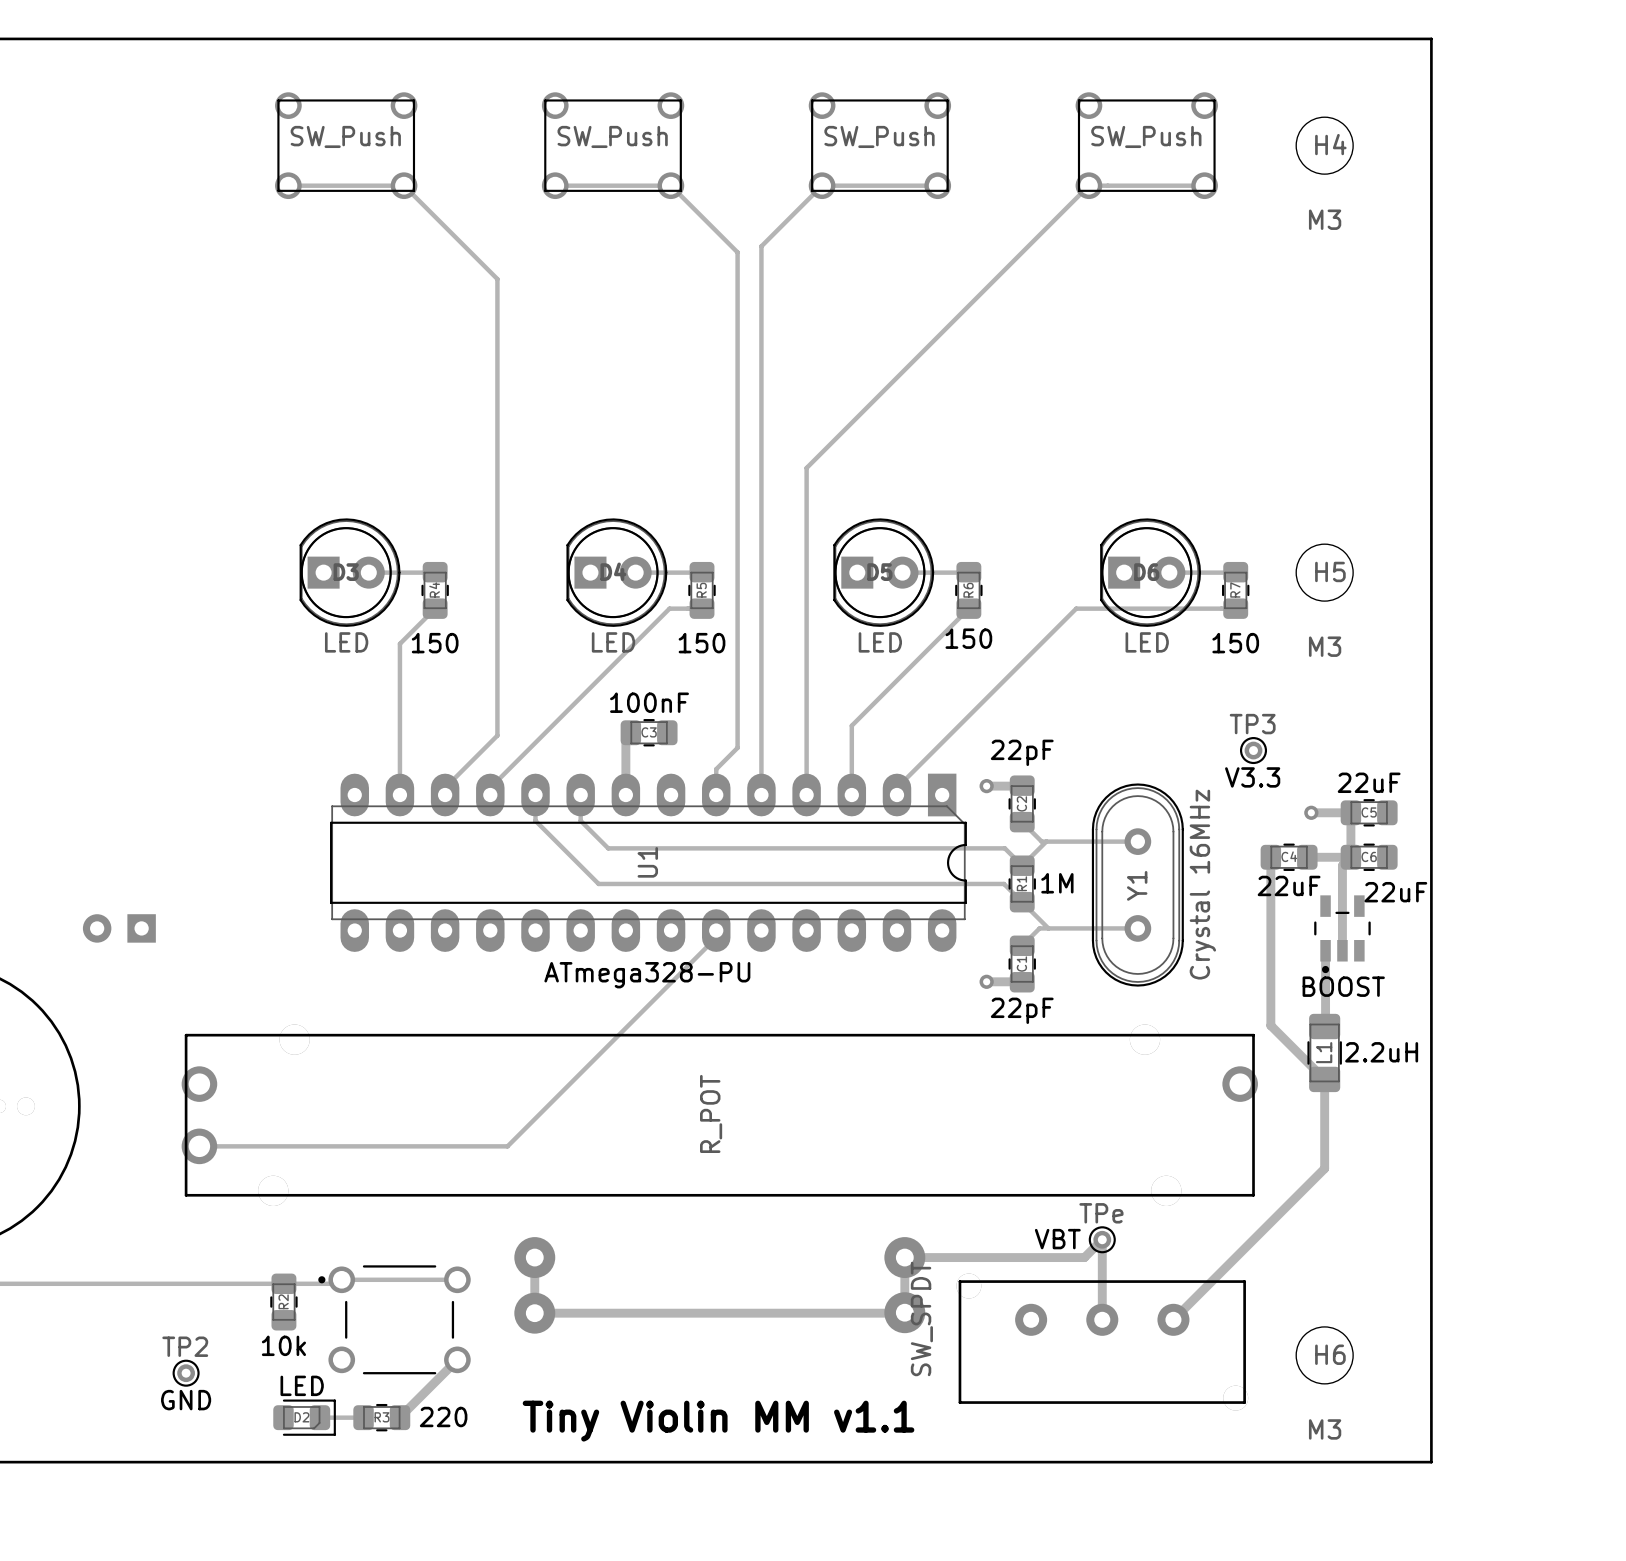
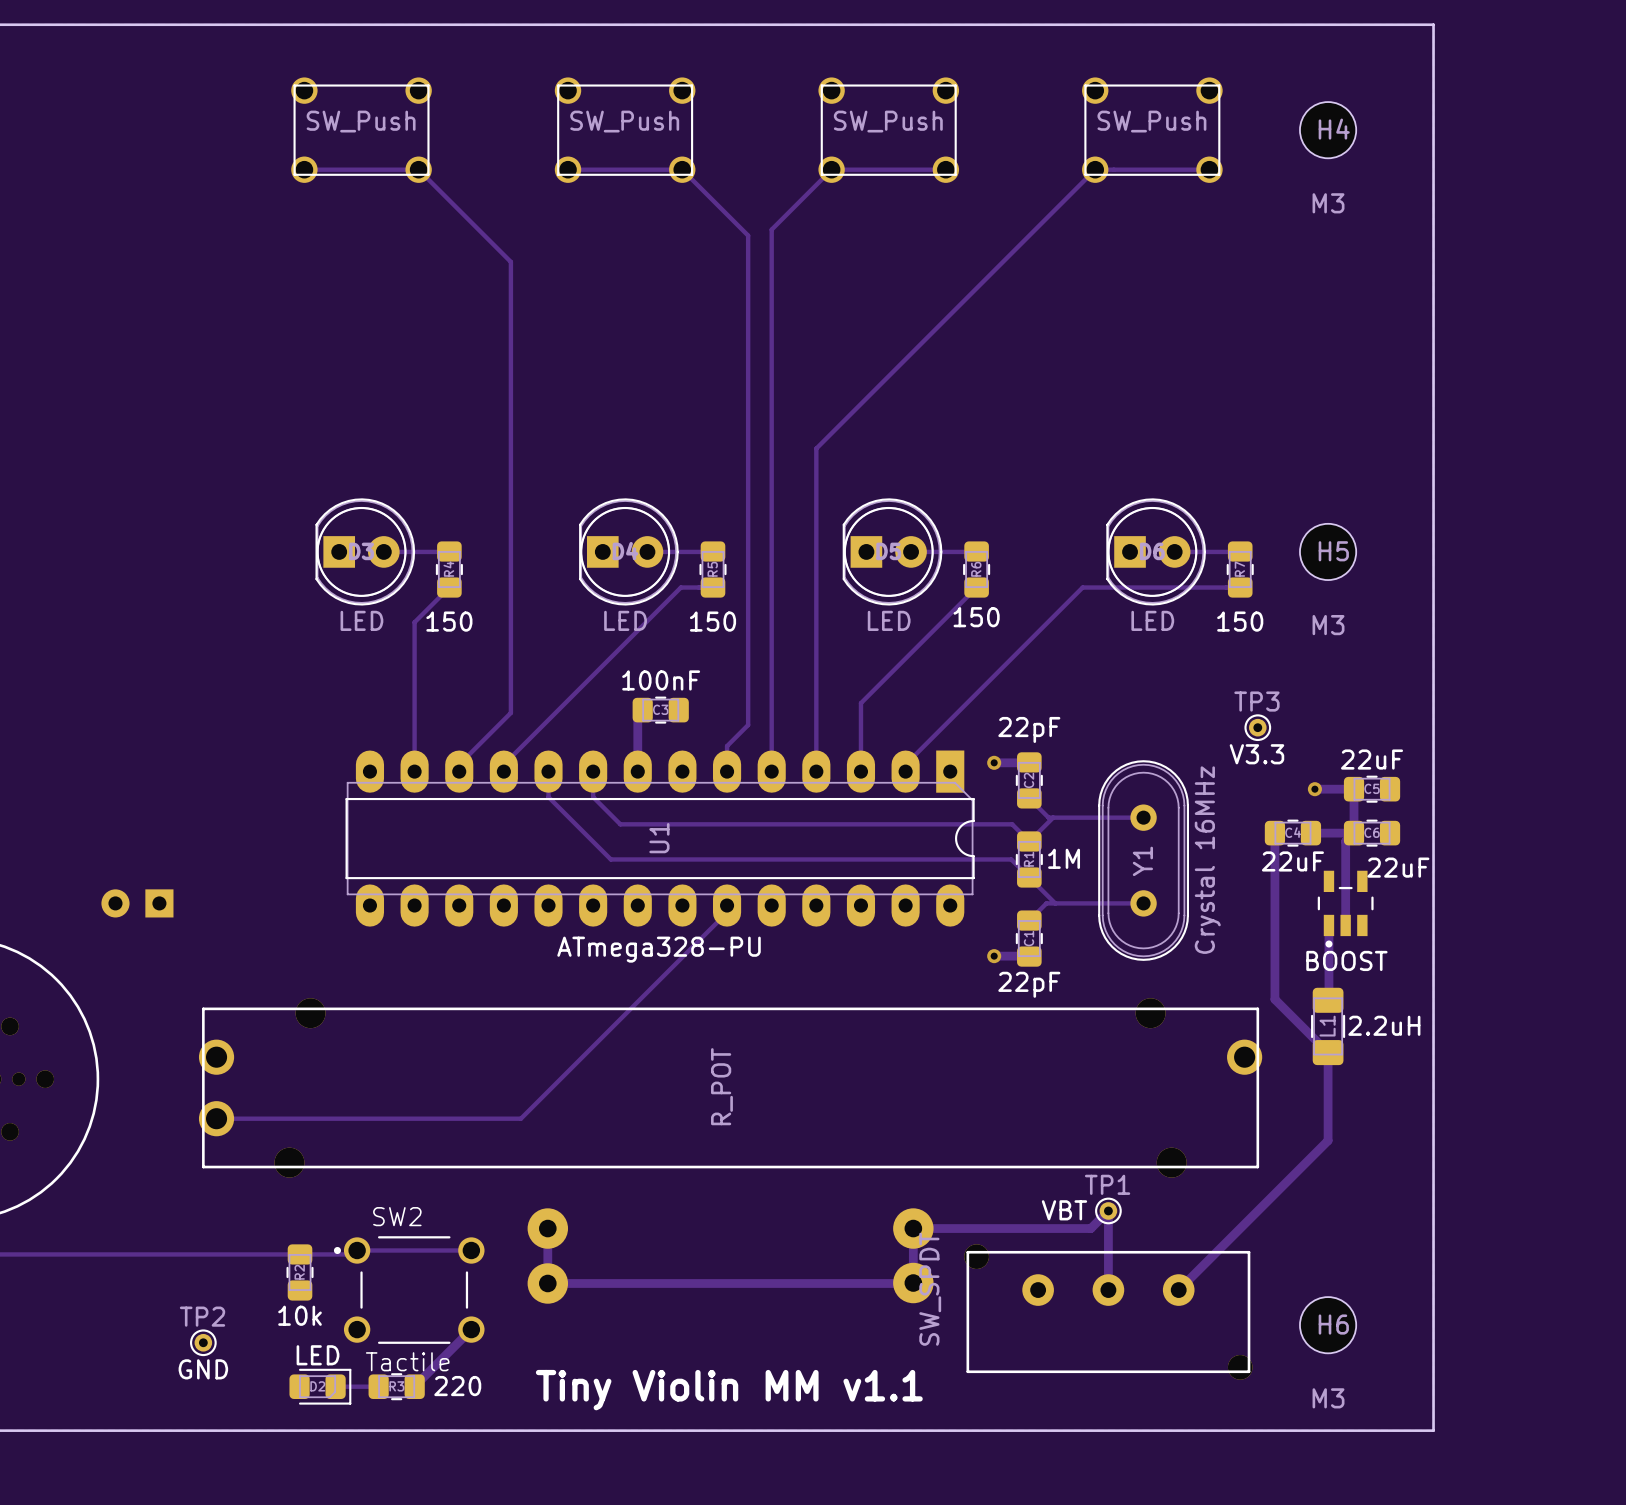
TPe name: TPe (1101, 1213) -> TP1 (1107, 1184)
SW2 name: none -> SW2 (397, 1216)
SW2 value: none -> Tactile (407, 1361)

